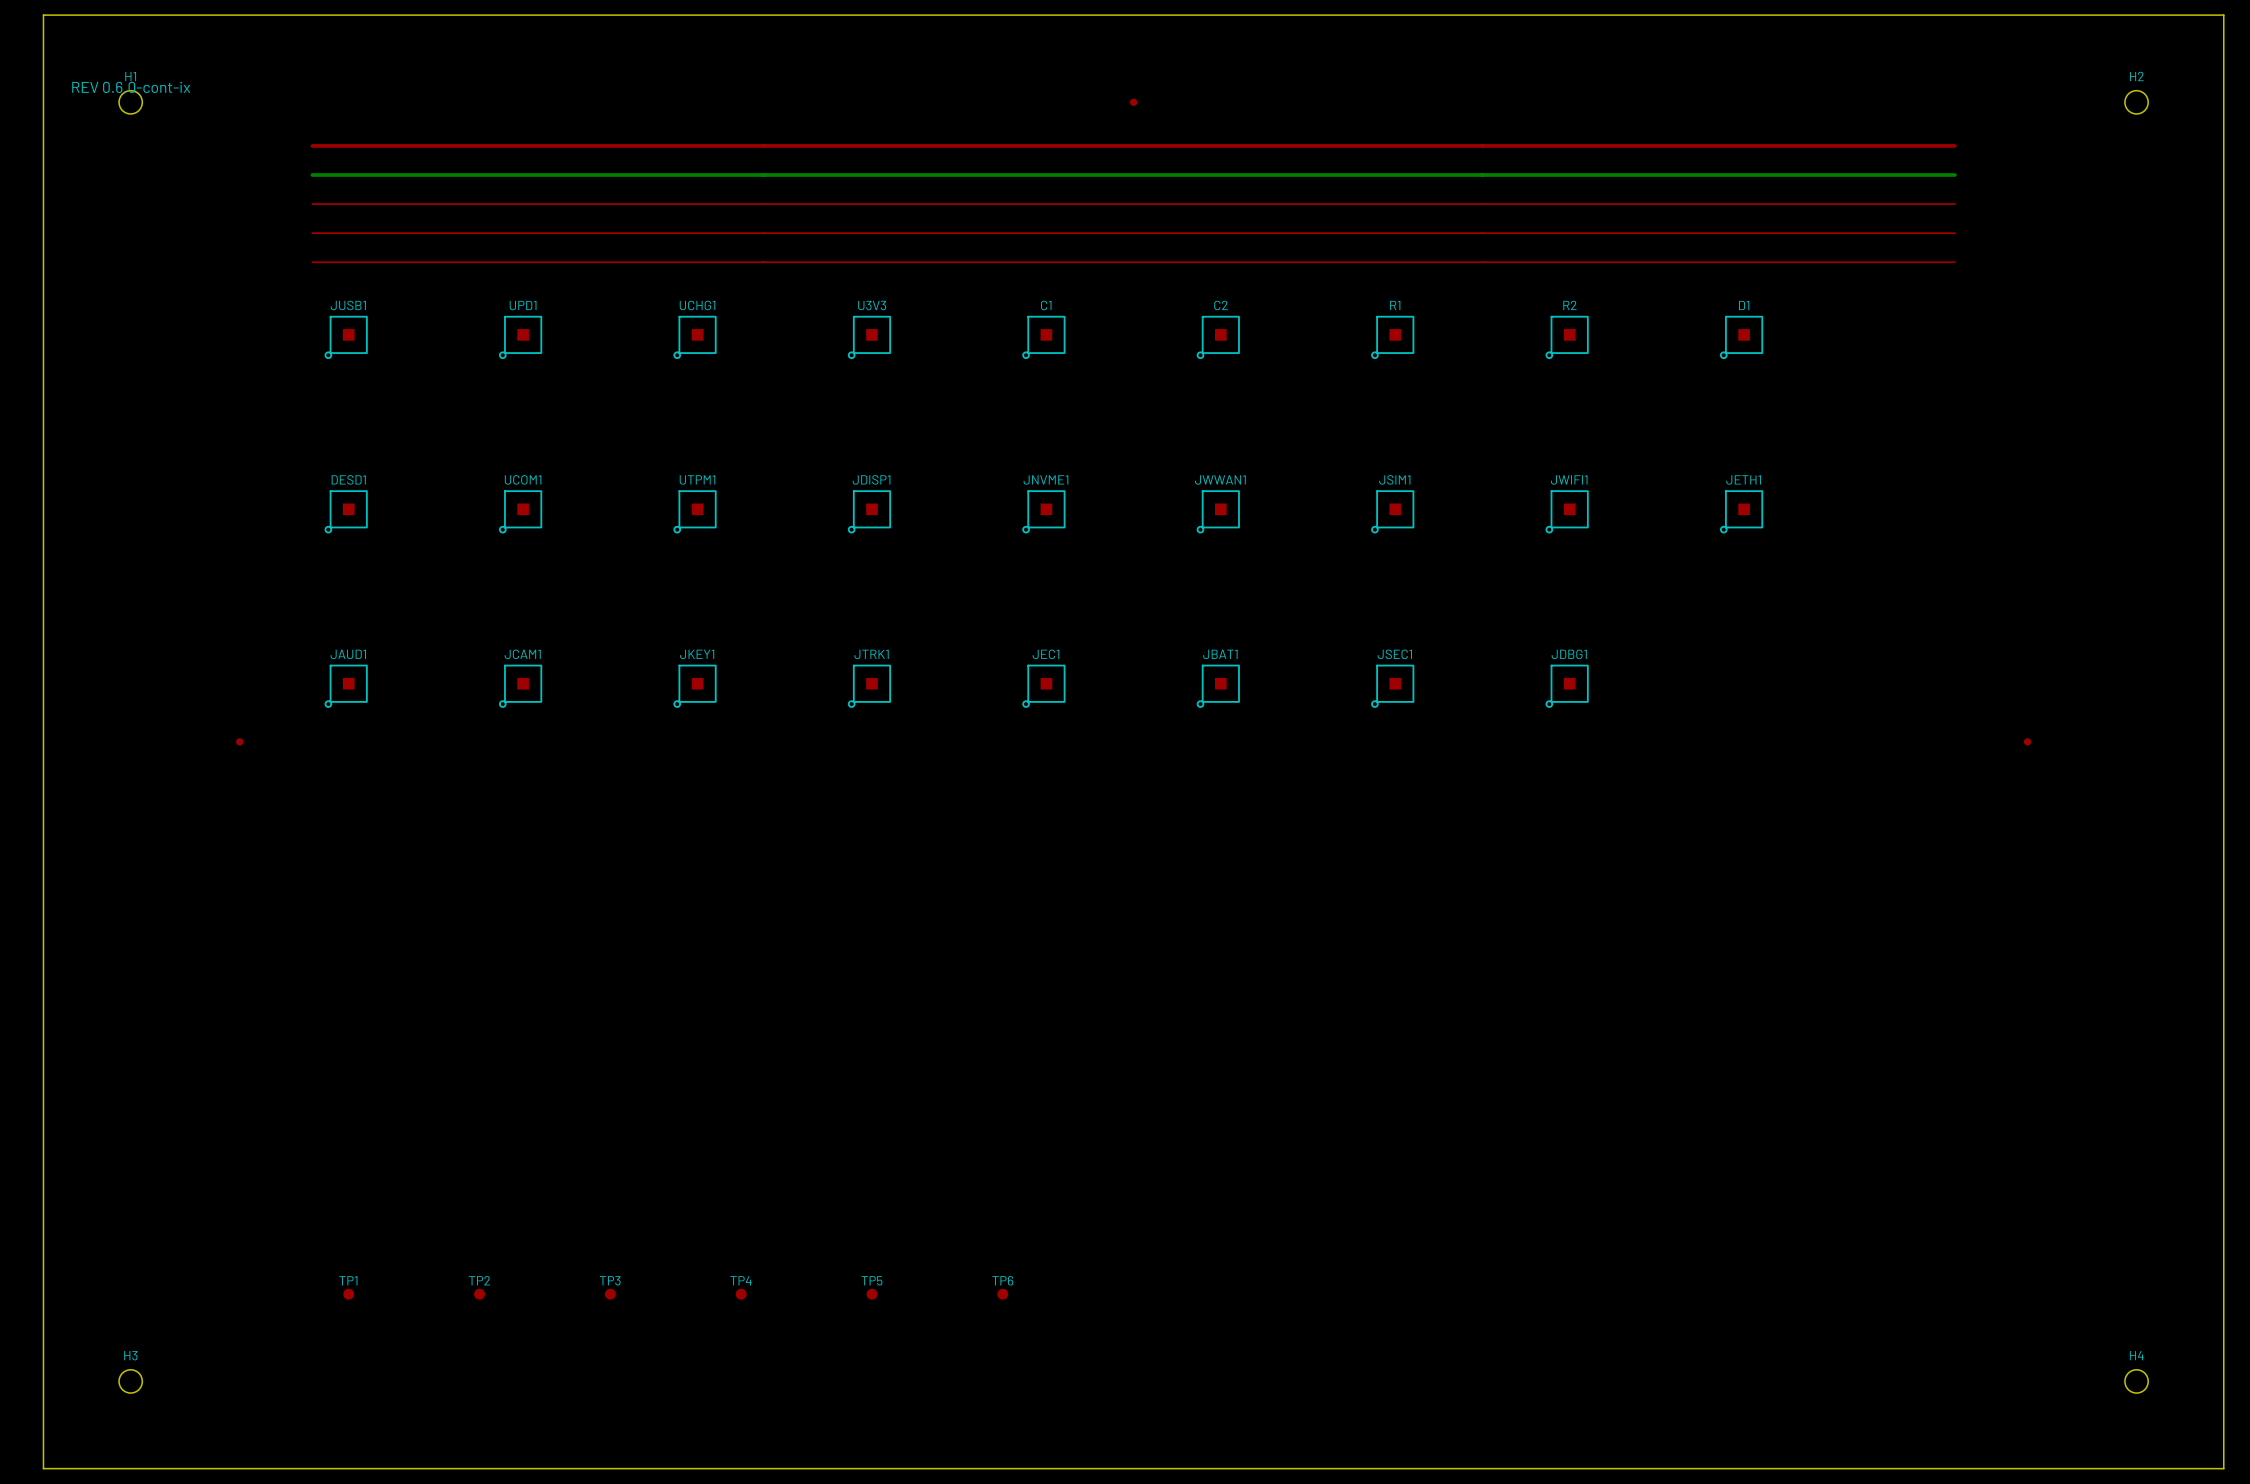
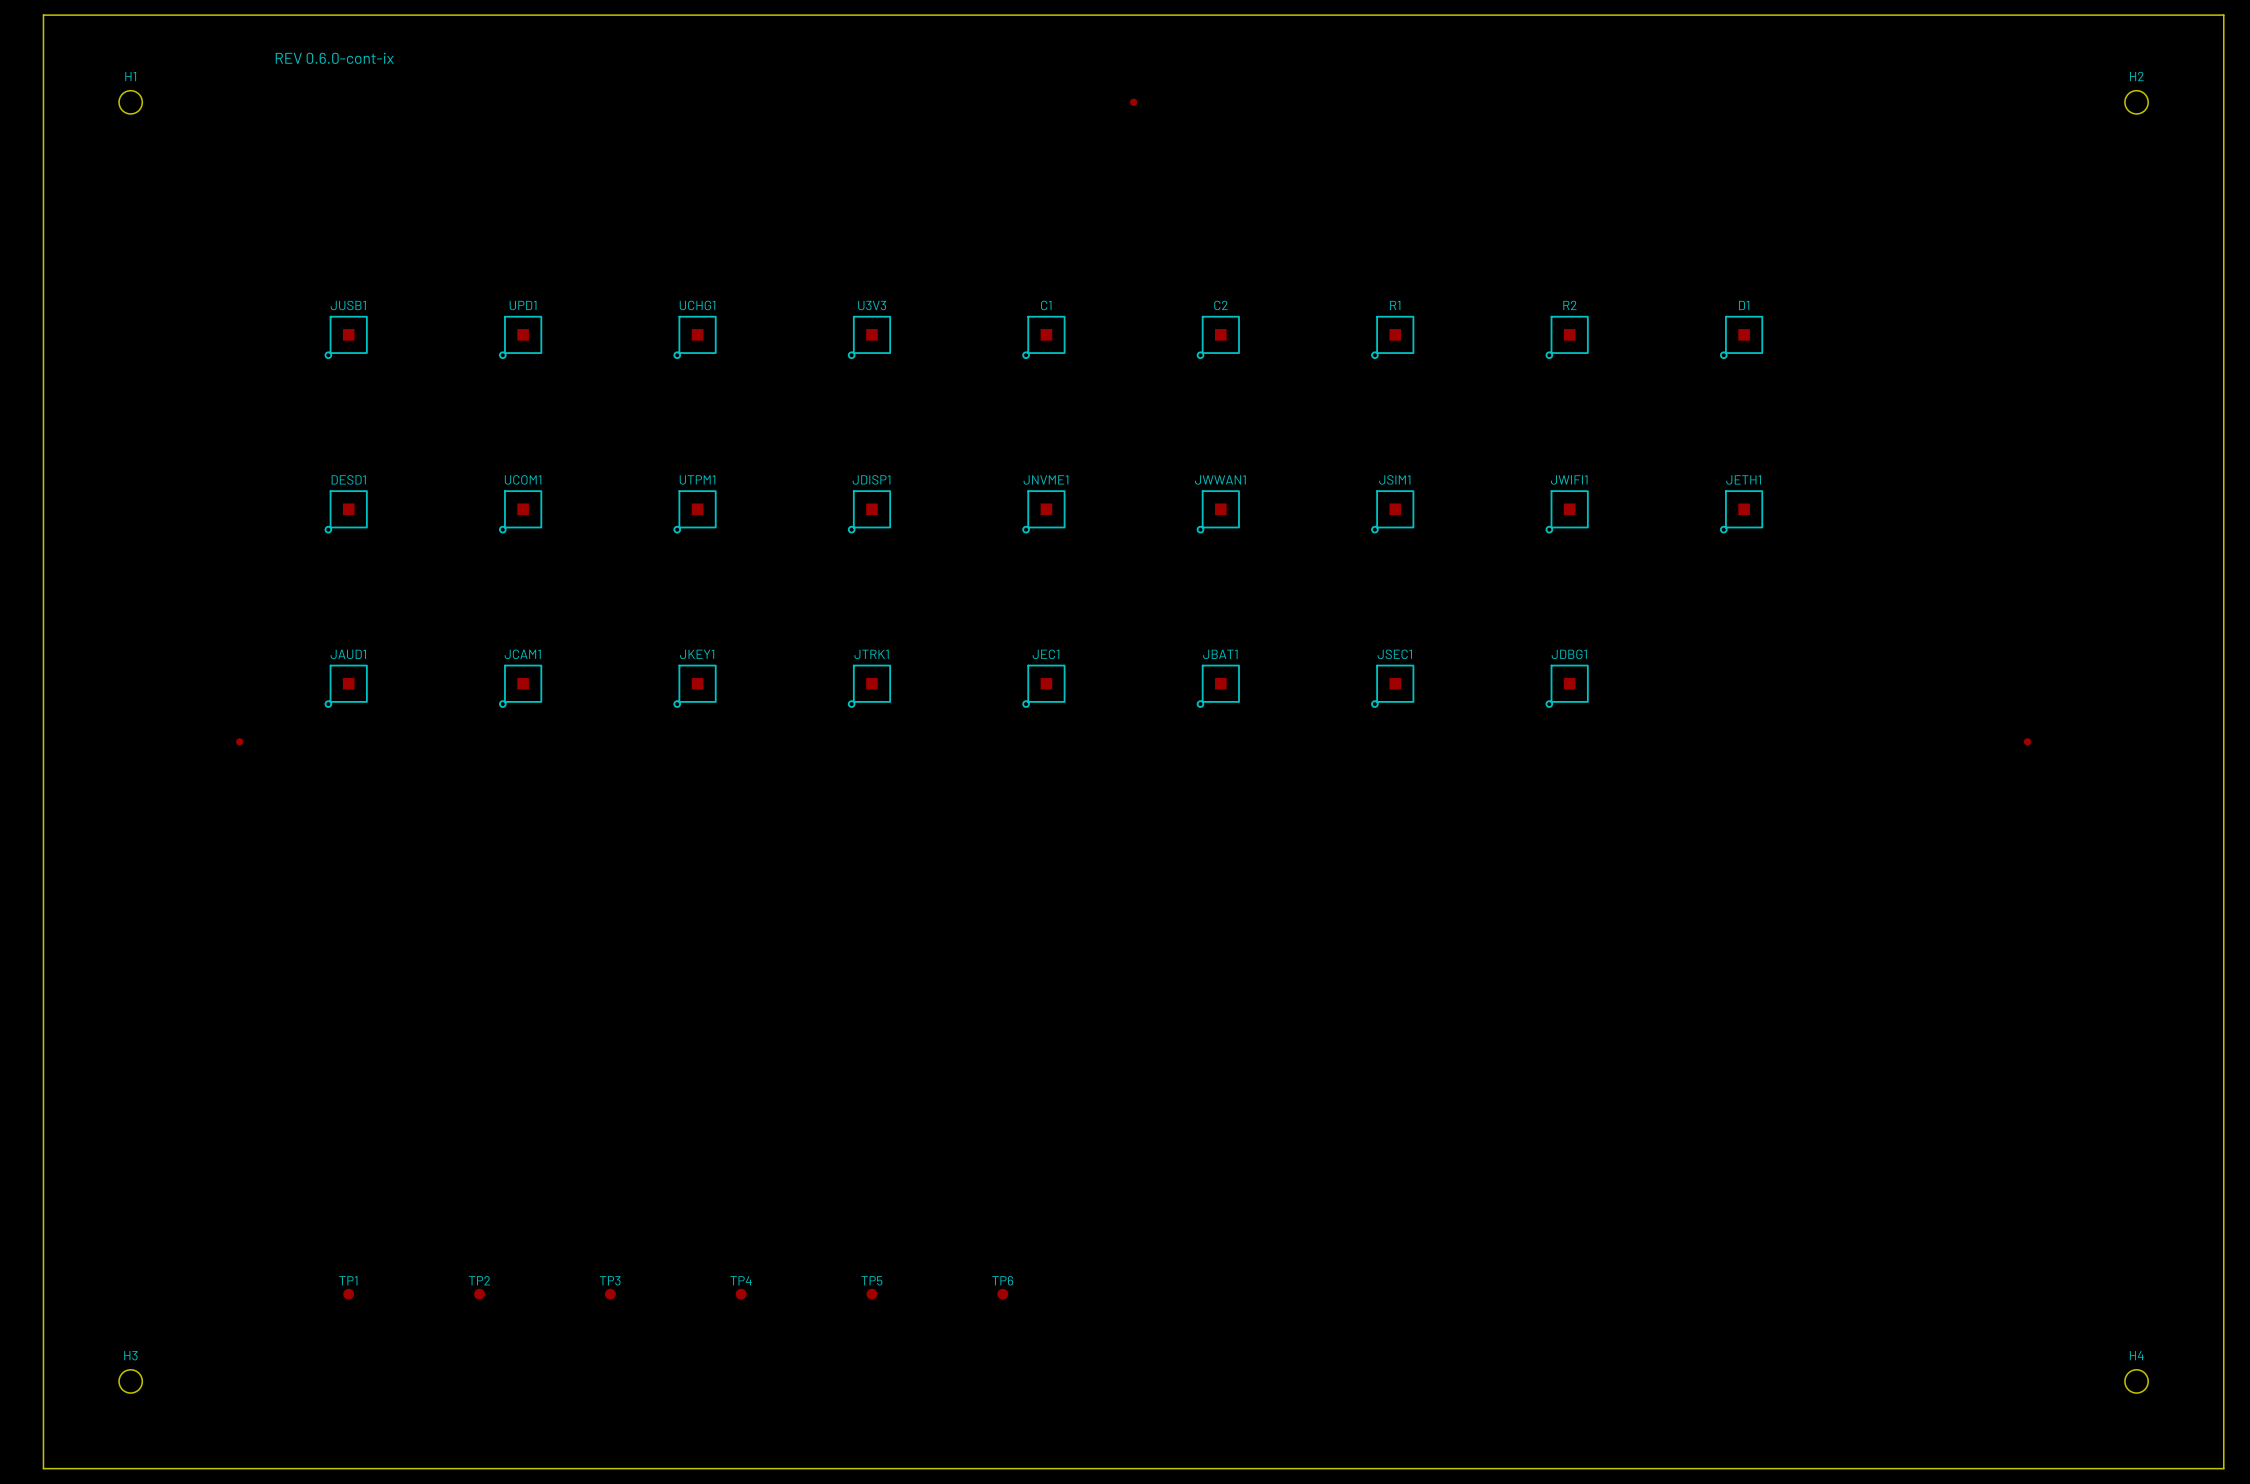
text: none -> REV 0.6.0-cont-ix (334, 58)
text: REV 0.6.0-cont-ix (131, 87) -> none
top track: (312, 145) (1954, 145) -> none
bottom track: (312, 174) (1954, 174) -> none
top track: (312, 204) (1954, 204) -> none
top track: (312, 233) (1954, 233) -> none
top track: (312, 262) (1954, 262) -> none

